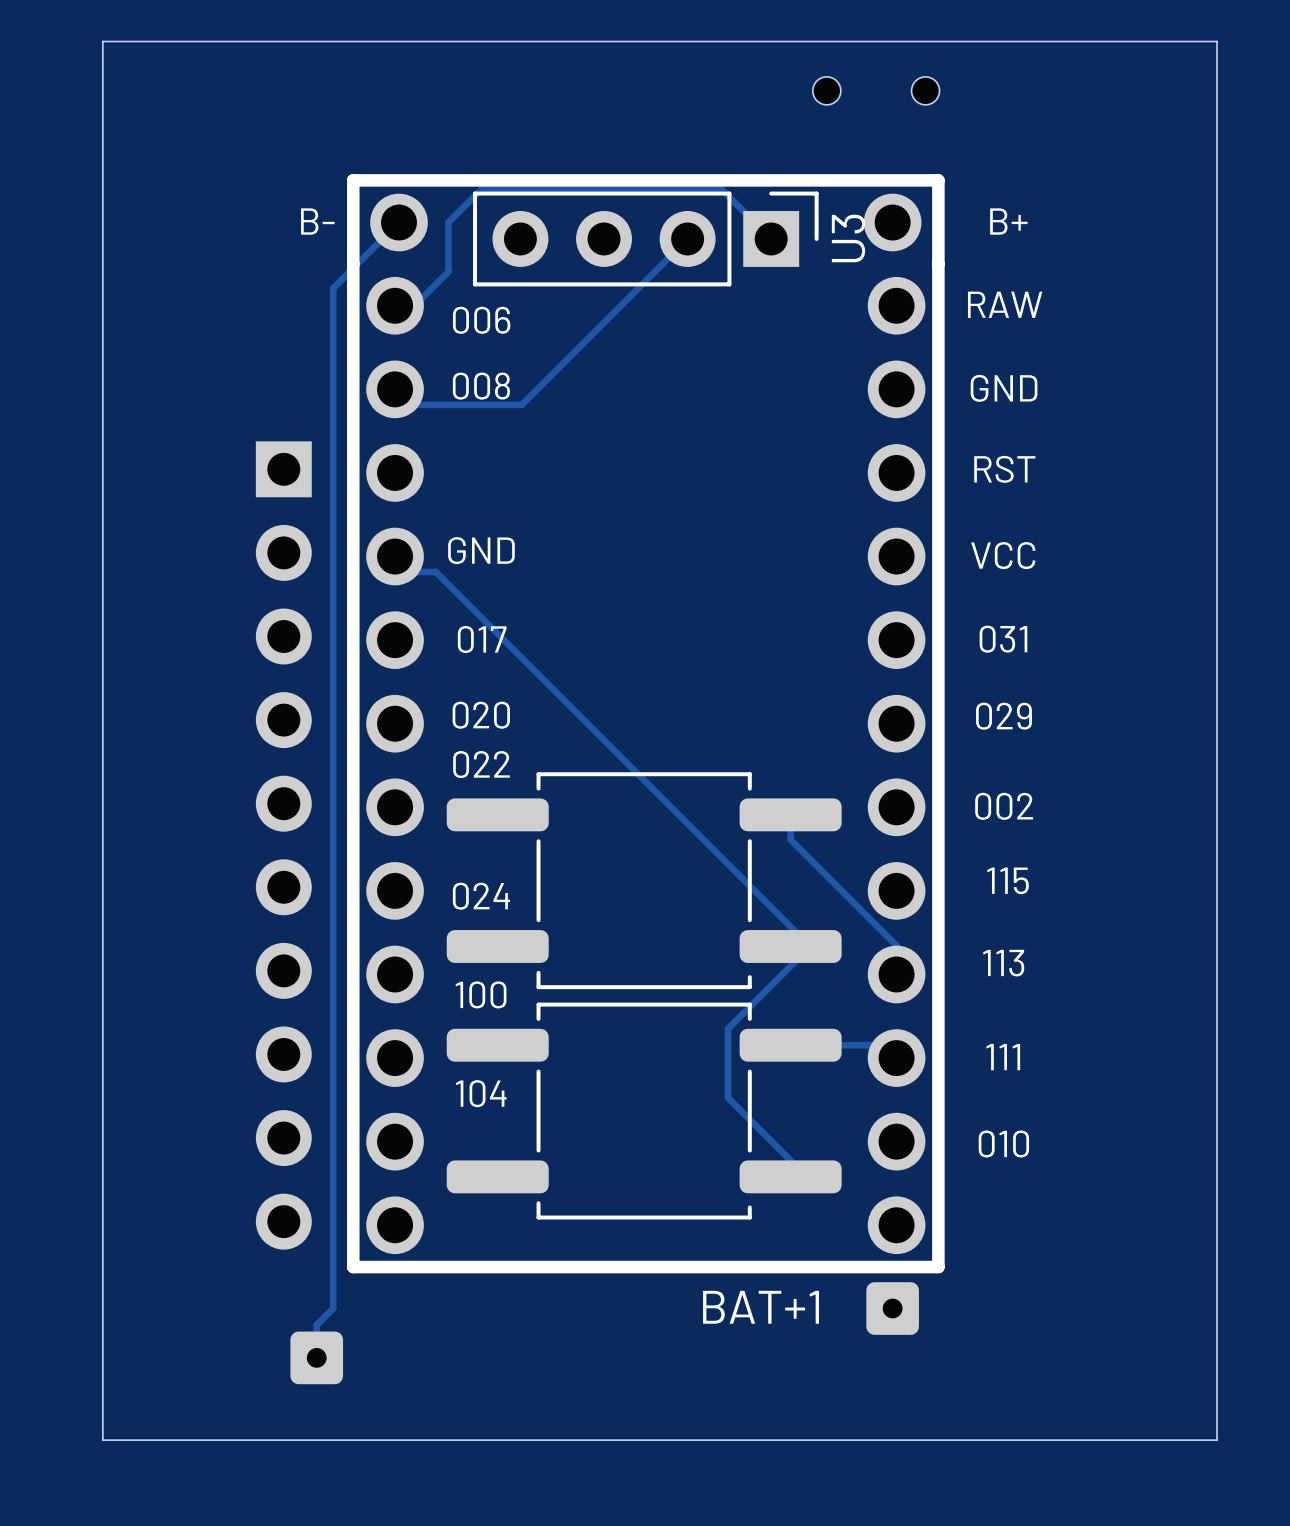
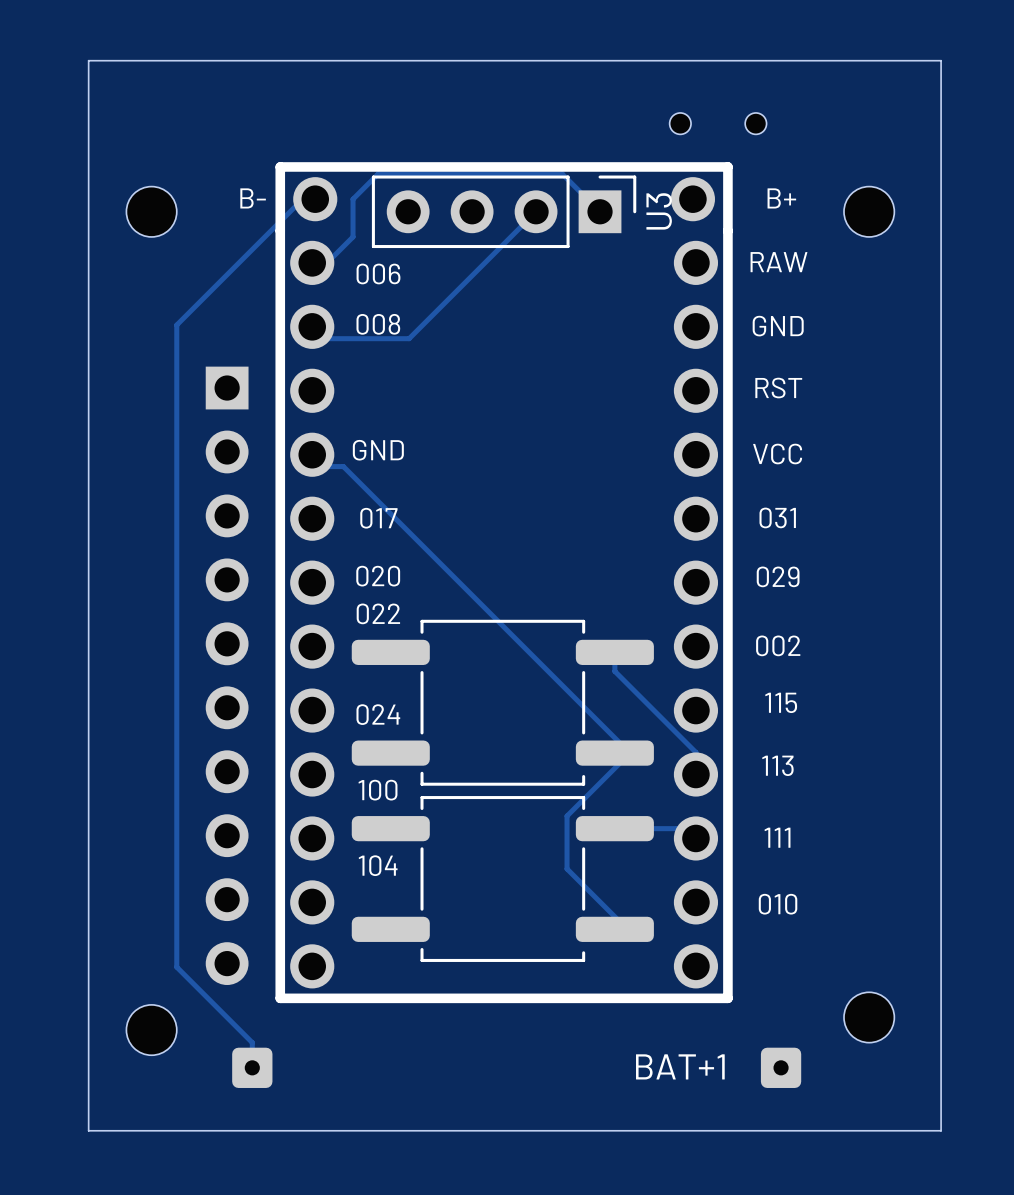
part position: (876, 90) -> (718, 123)
track: (399, 222) (333, 288) (333, 1308) (316, 1324) -> (302, 199) (176, 325) (176, 967) (252, 1042)
part: none -> (151, 211)
part: none -> (869, 211)
part: none -> (869, 1017)
part: none -> (151, 1030)
BAT+1 position: (892, 1308) -> (781, 1067)

